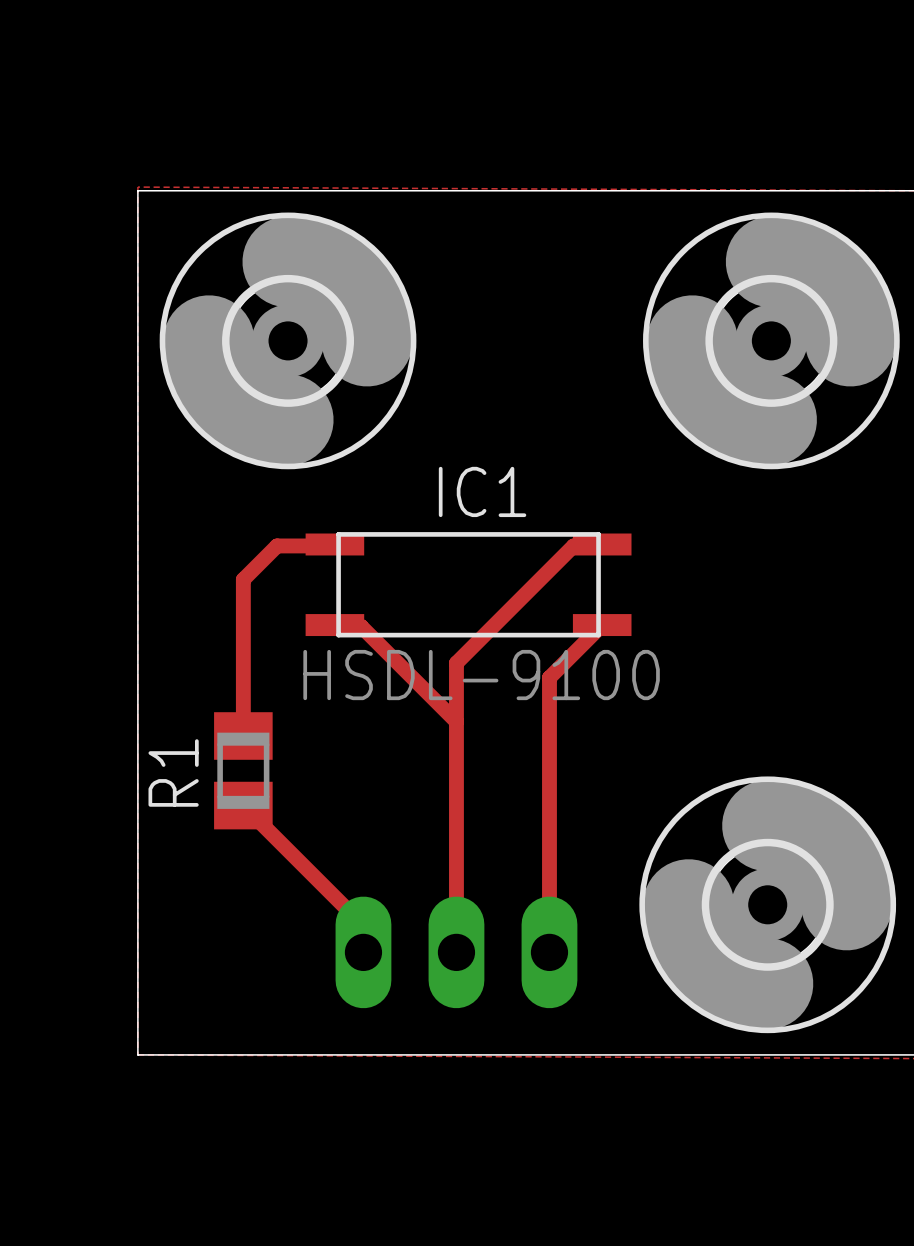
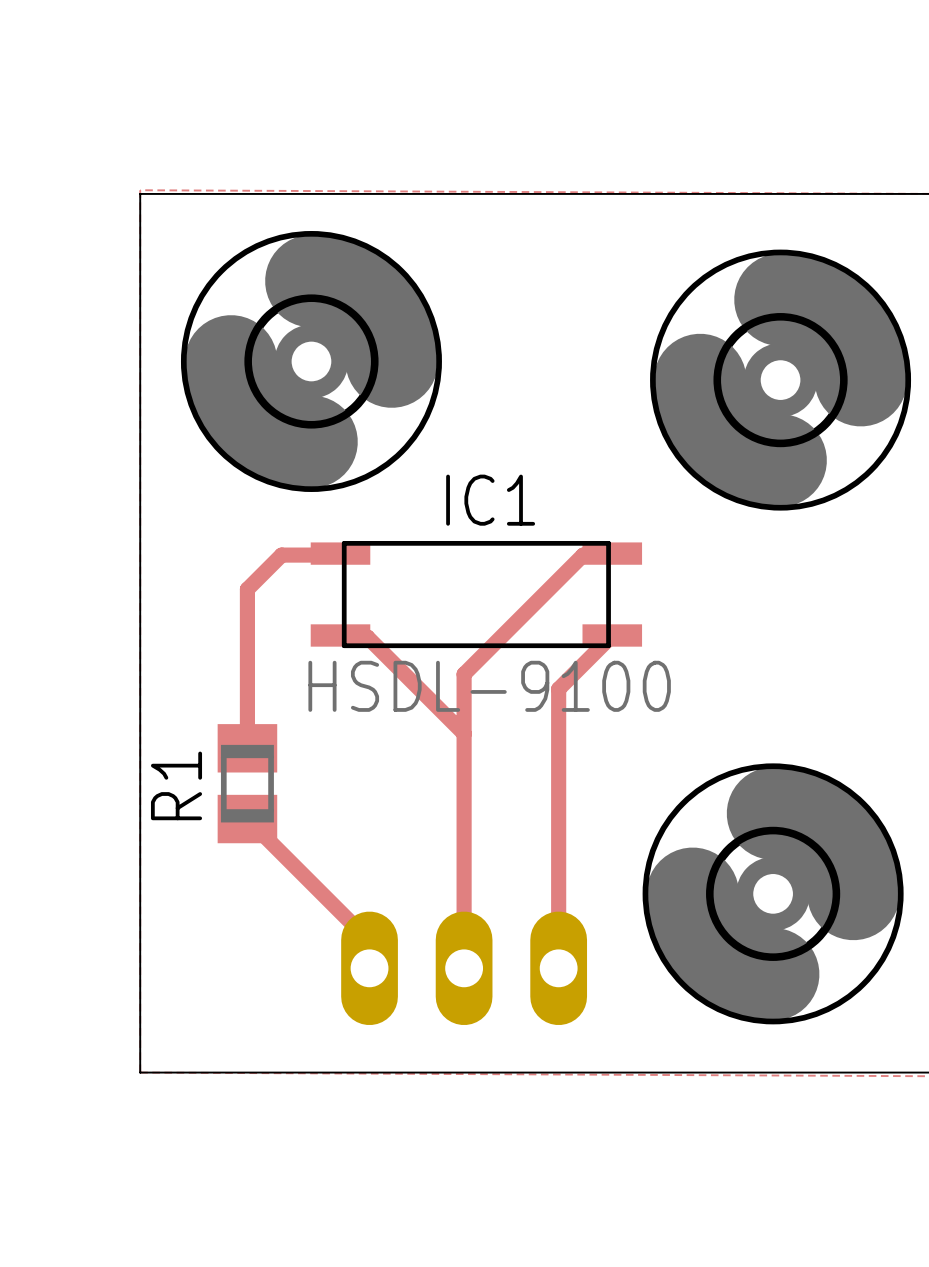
part position: (288, 340) -> (311, 361)
part position: (771, 340) -> (780, 380)
part position: (767, 904) -> (773, 893)

